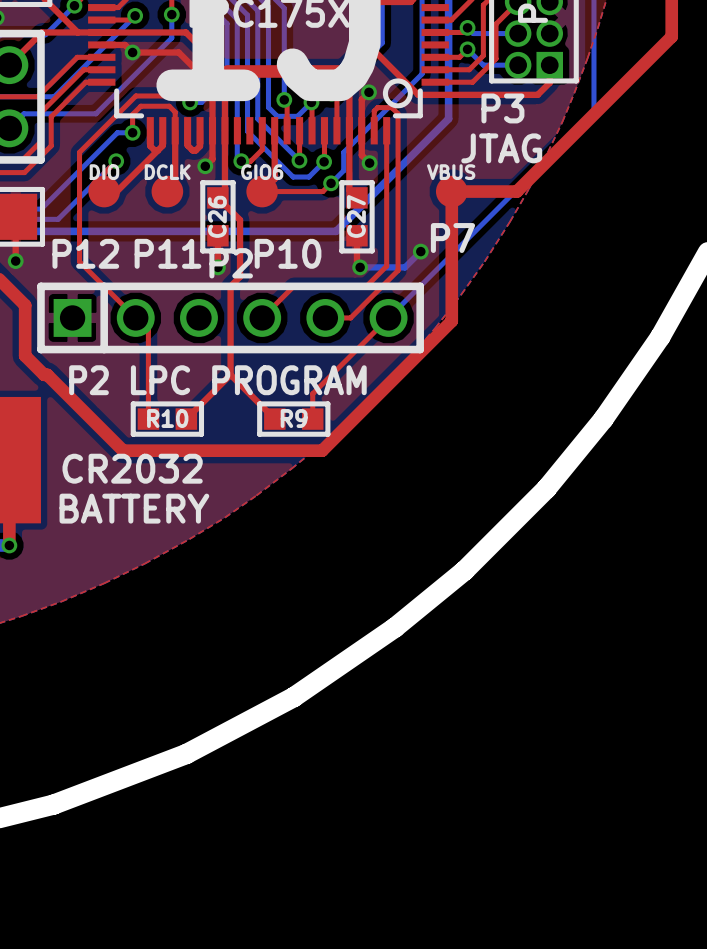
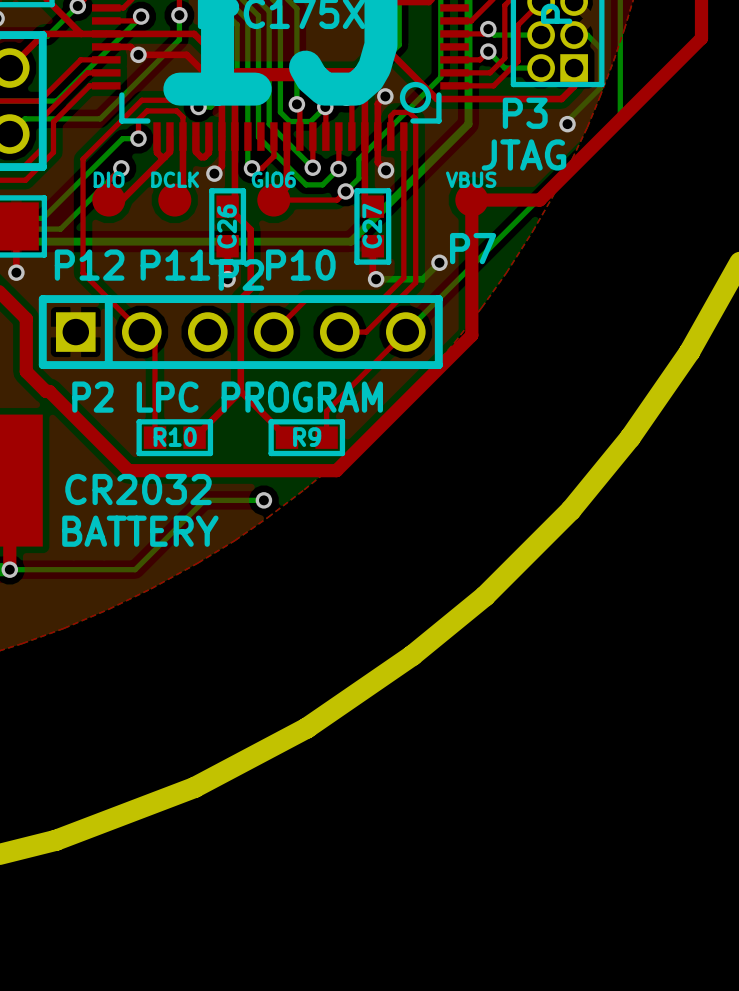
bottom track: none -> (574, 35) (587, 35) (600, 48) (600, 87) (567, 120) (567, 124)
via: none -> (567, 124)
bottom track: none -> (263, 500) (204, 500) (135, 569) (9, 569)
via: none -> (263, 500)

